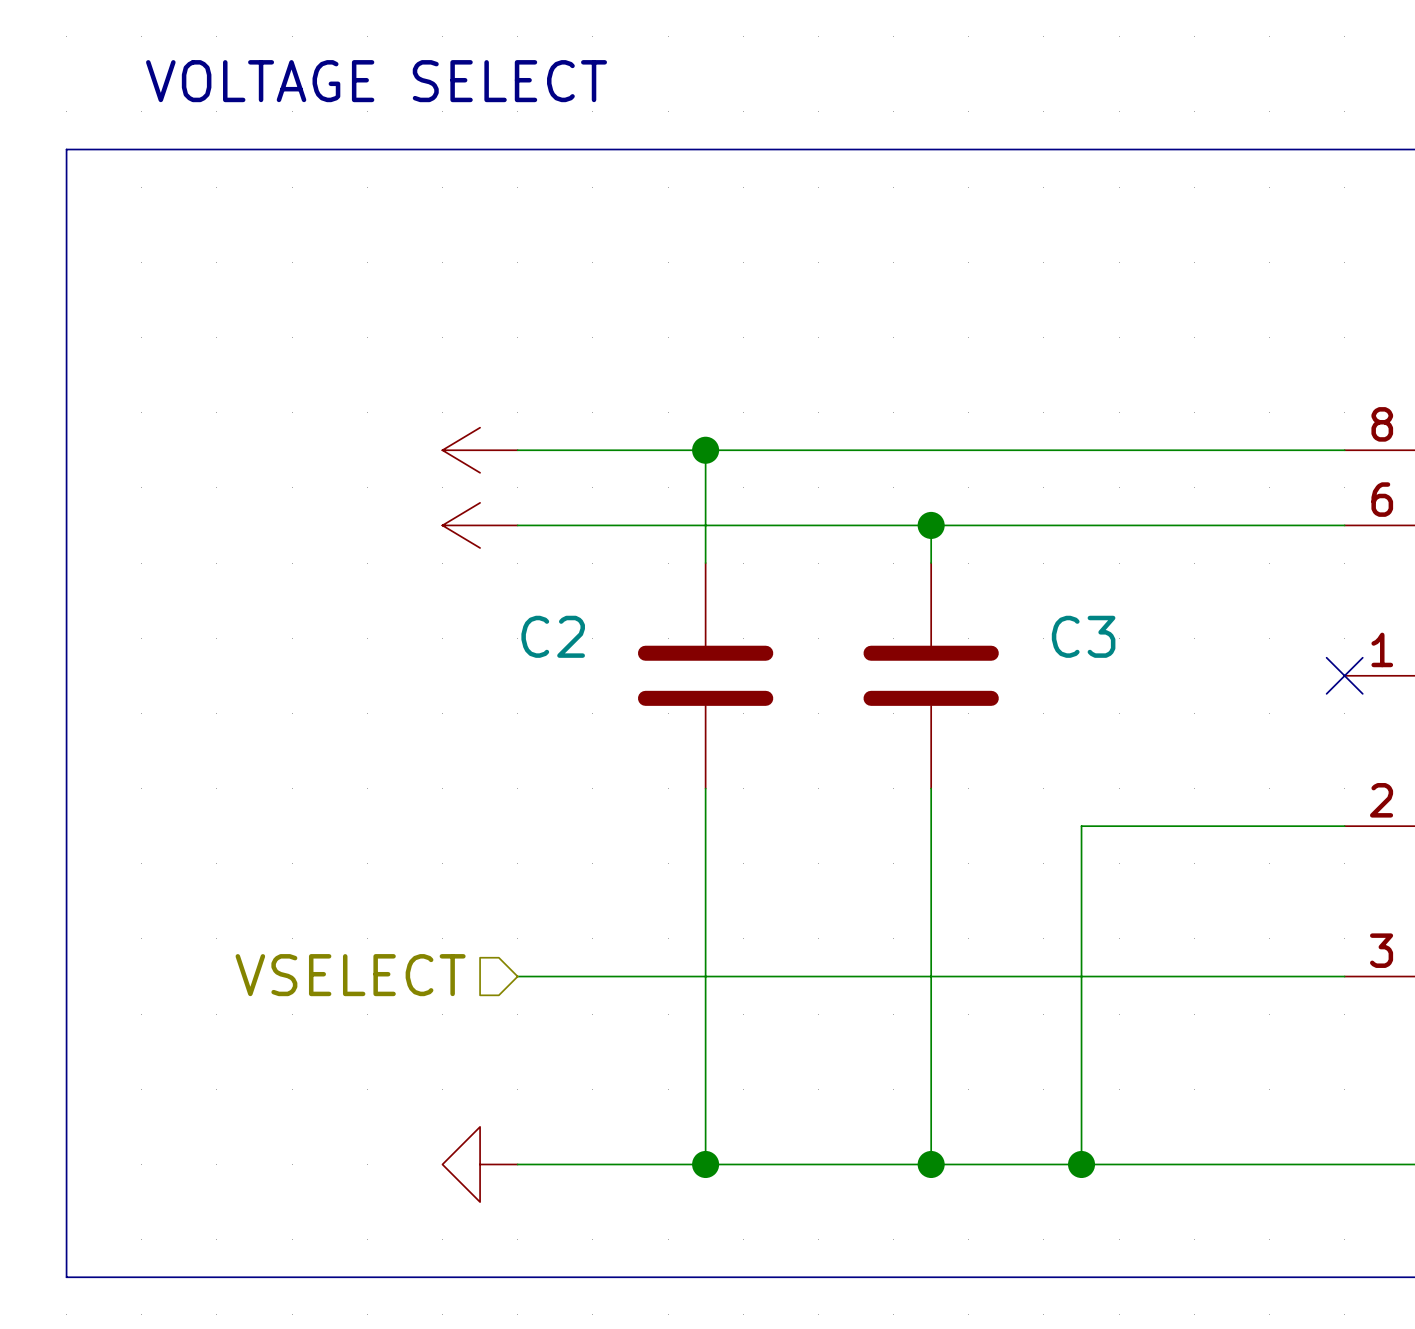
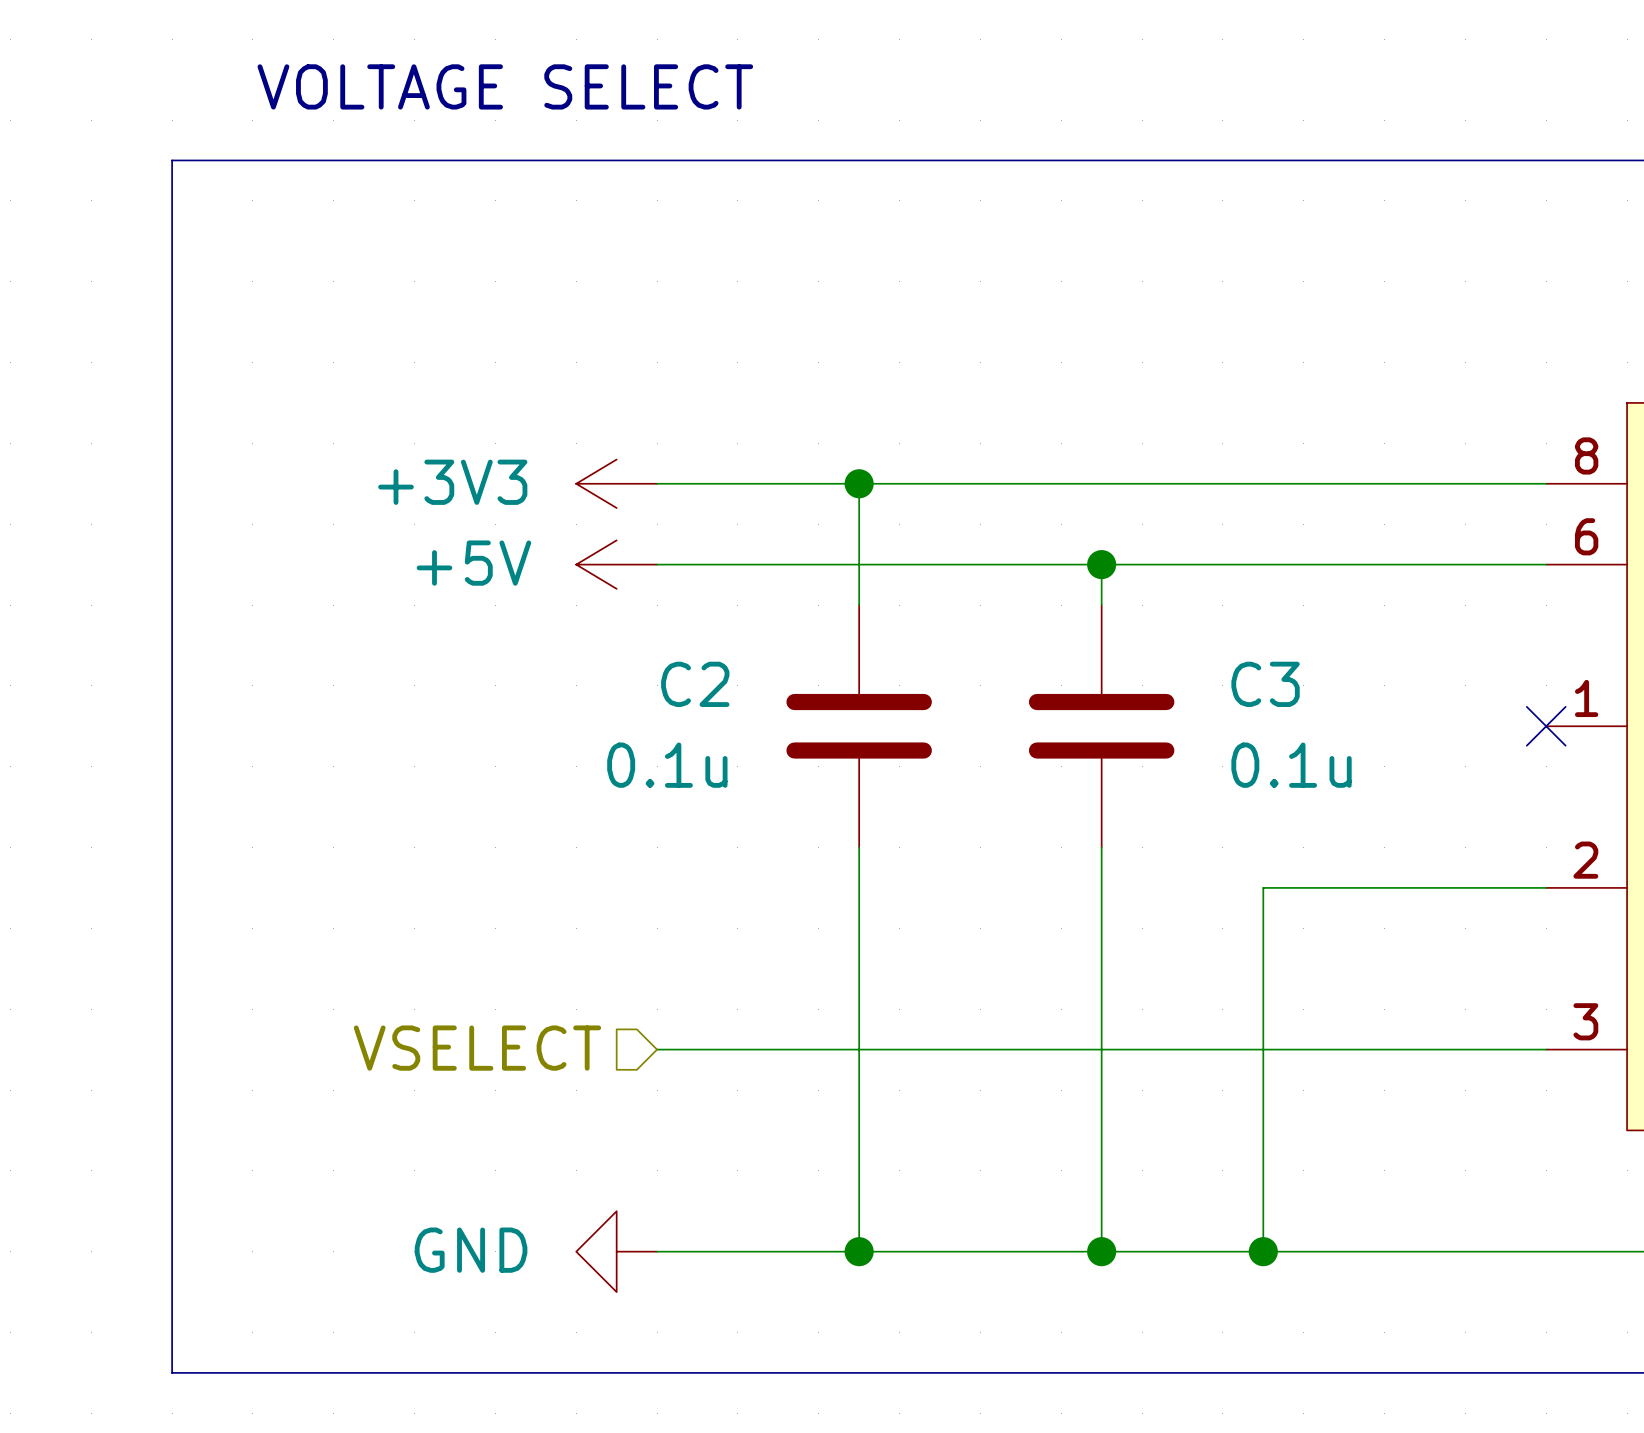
power symbol text: none -> +3V3 (452, 482)
power symbol text: none -> +5V (473, 563)
C2 value: none -> 0.1u (667, 765)
C3 value: none -> 0.1u (1291, 765)
power symbol text: none -> GND (471, 1250)

